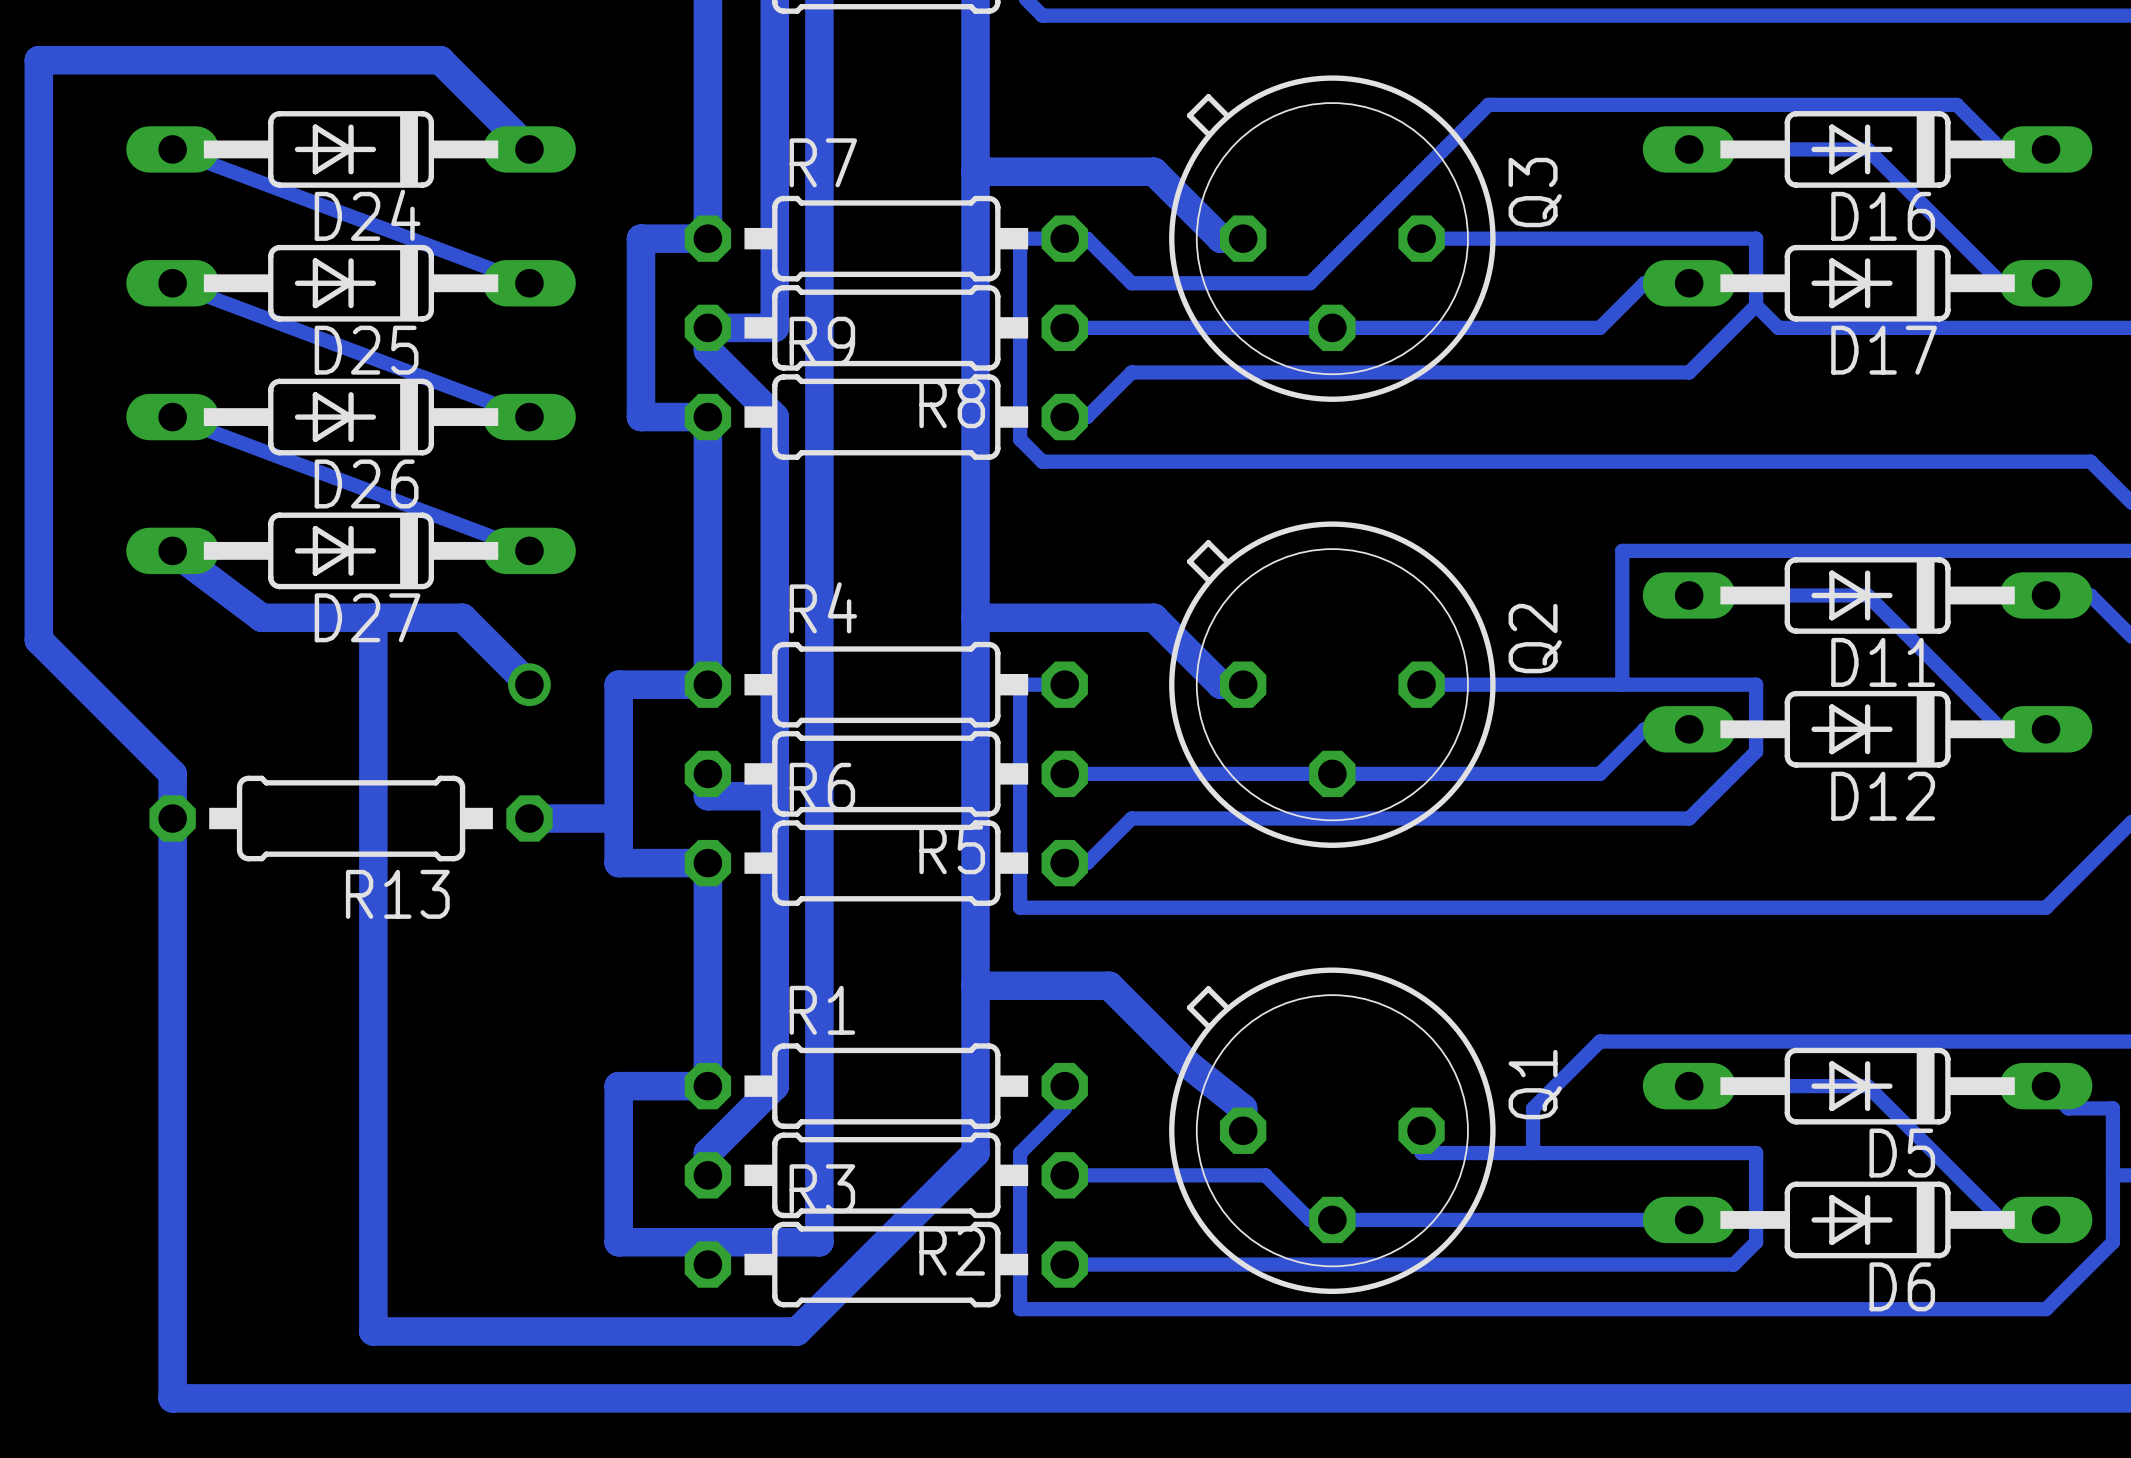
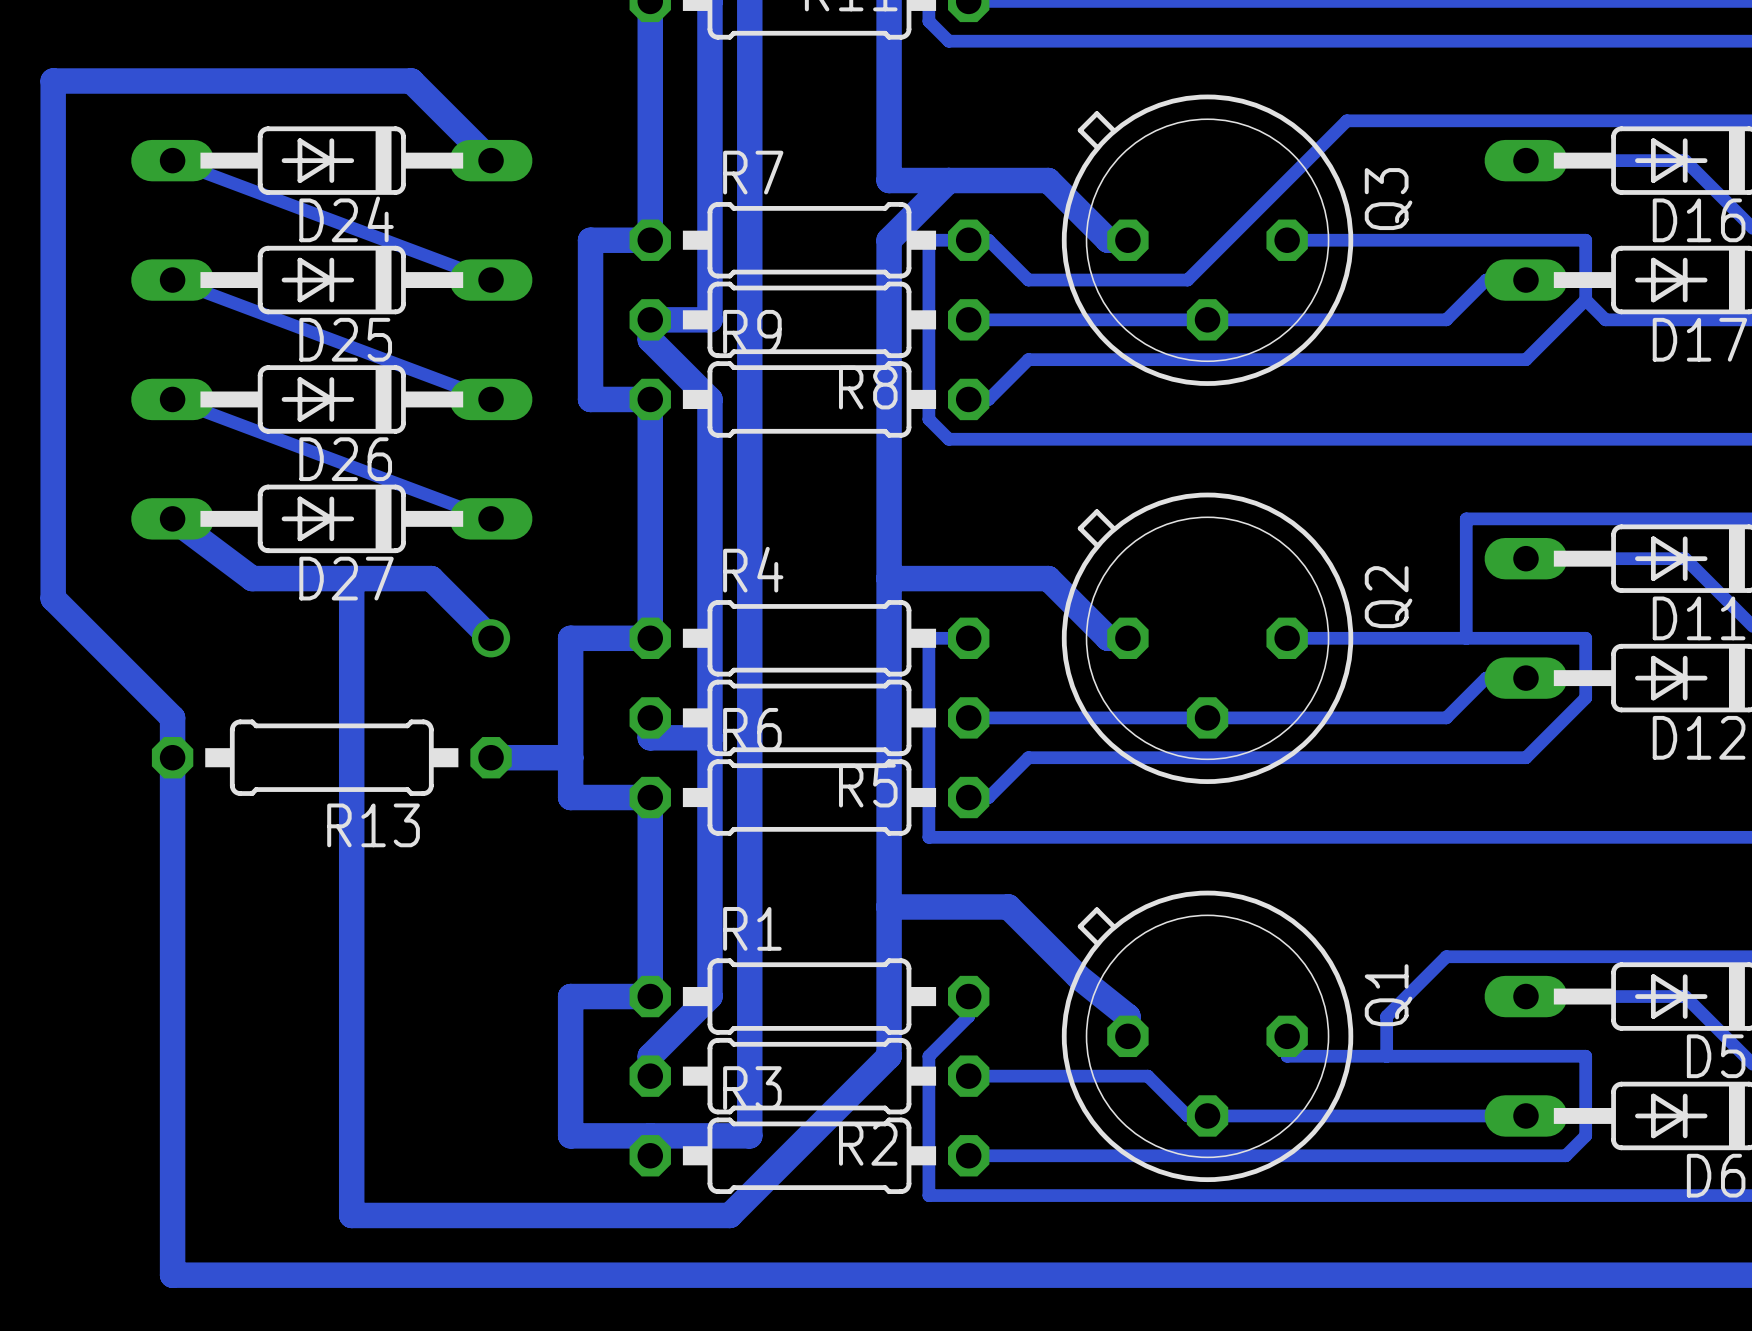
bottom track: (975, 171) (975, 238) -> (948, 180) (889, 240)

